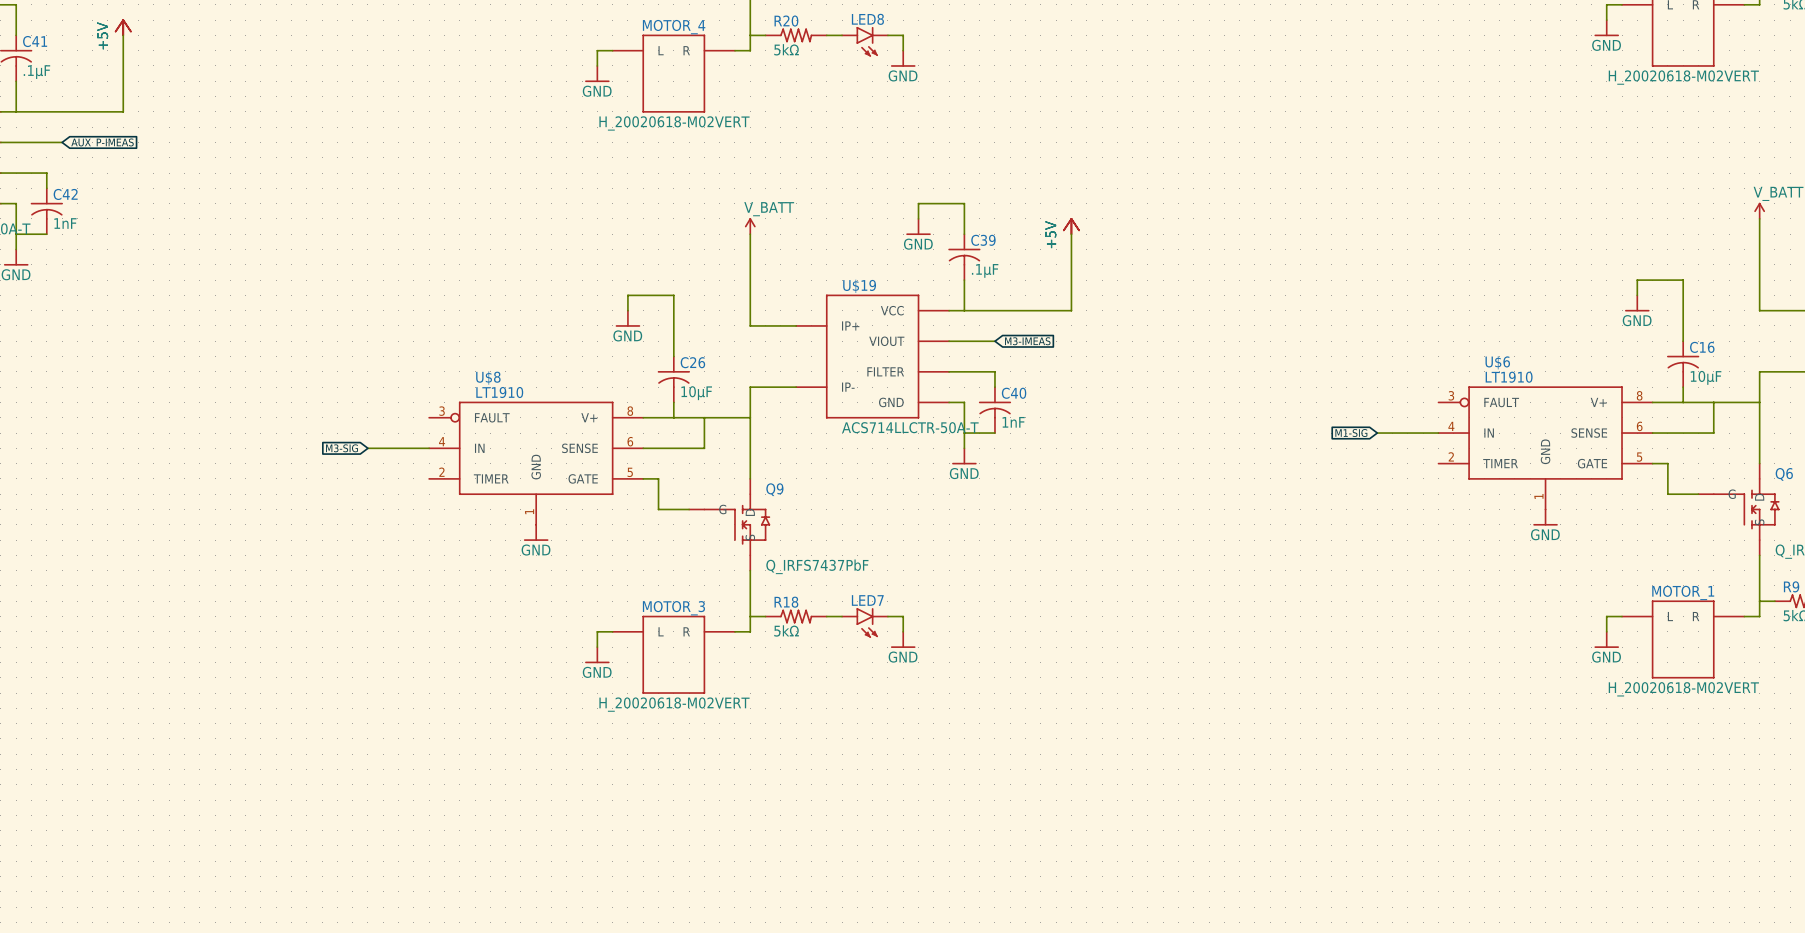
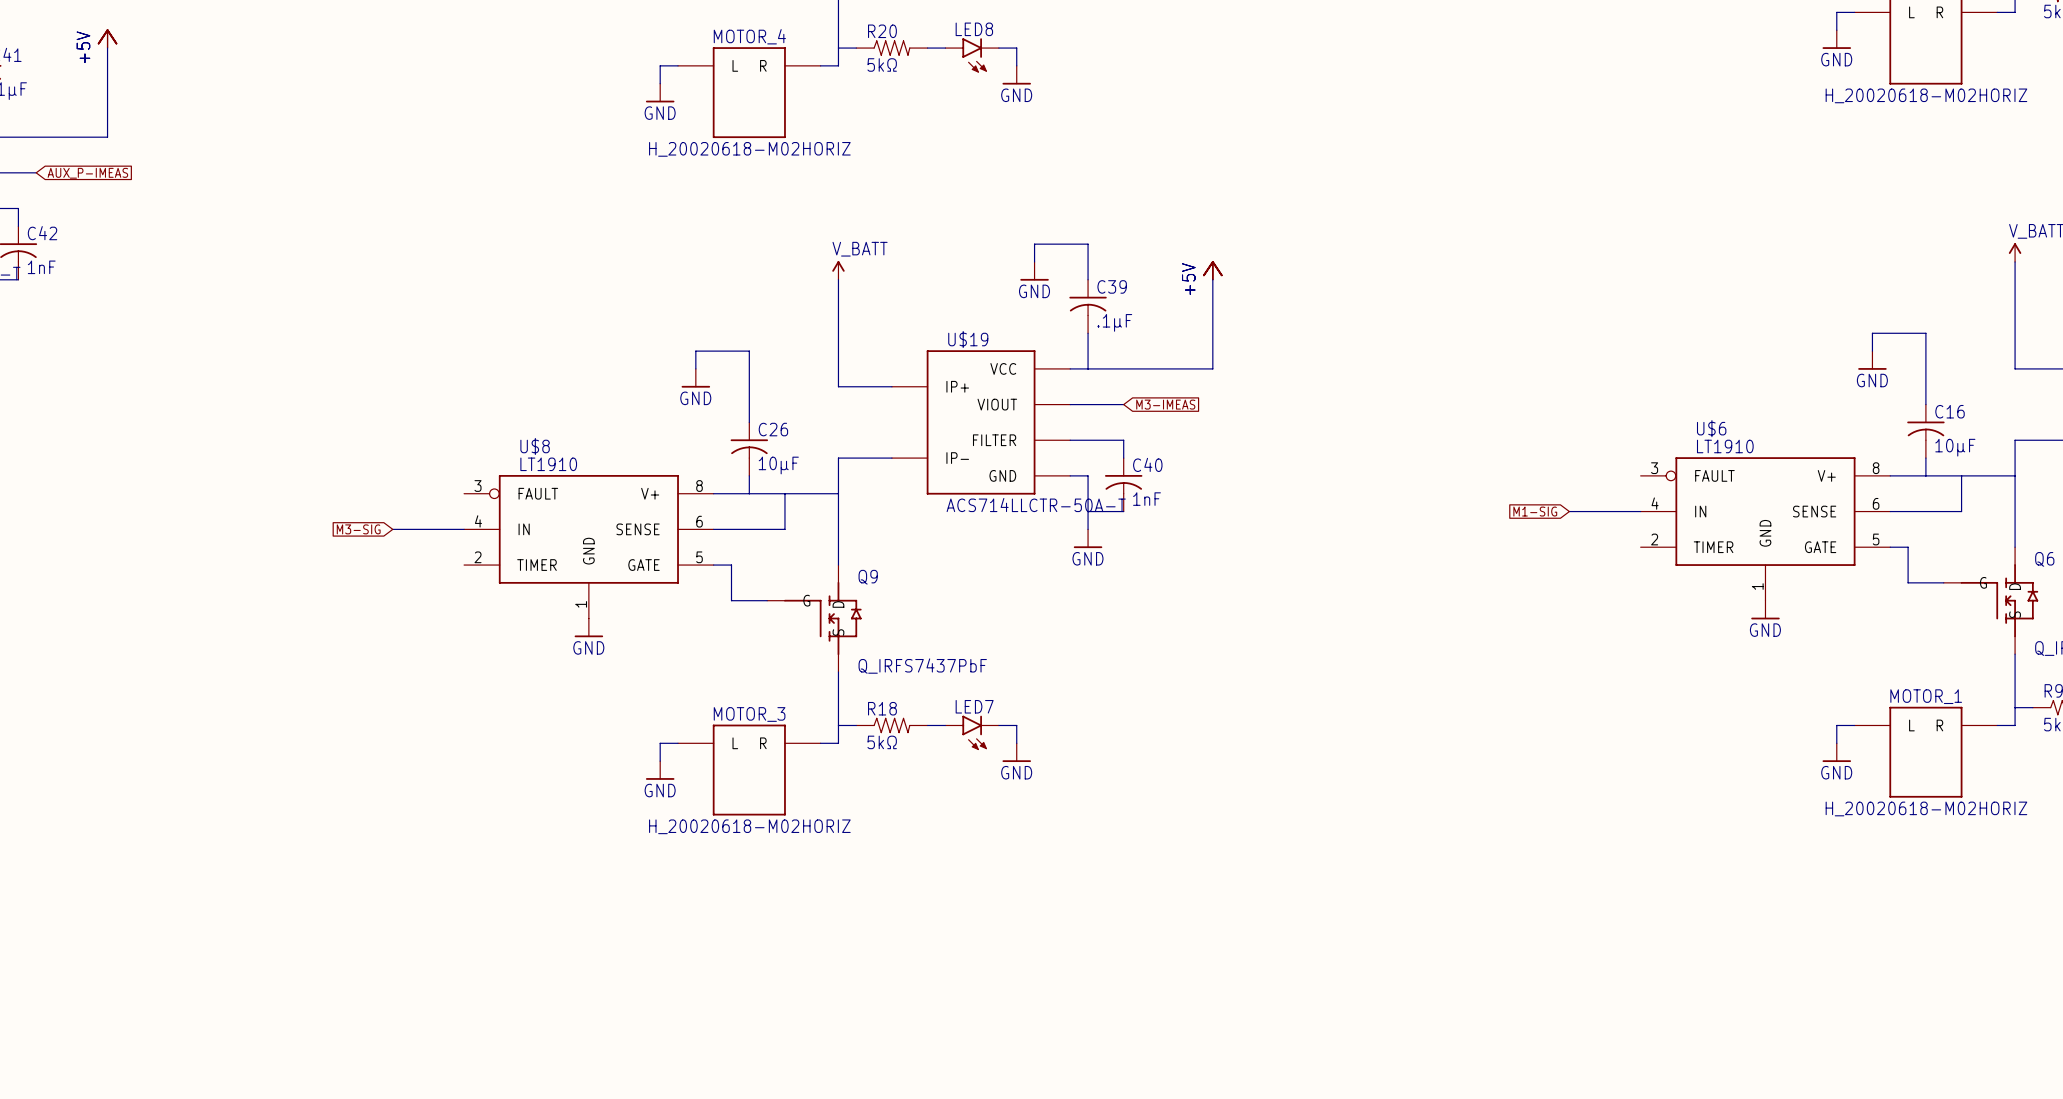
part value: H_20020618-M02VERT (1683, 77) -> H_20020618-M02HORIZ (1926, 95)
MOTOR_4 value: H_20020618-M02VERT (674, 123) -> H_20020618-M02HORIZ (749, 149)
MOTOR_1 value: H_20020618-M02VERT (1683, 689) -> H_20020618-M02HORIZ (1926, 808)
MOTOR_3 value: H_20020618-M02VERT (674, 704) -> H_20020618-M02HORIZ (749, 826)

